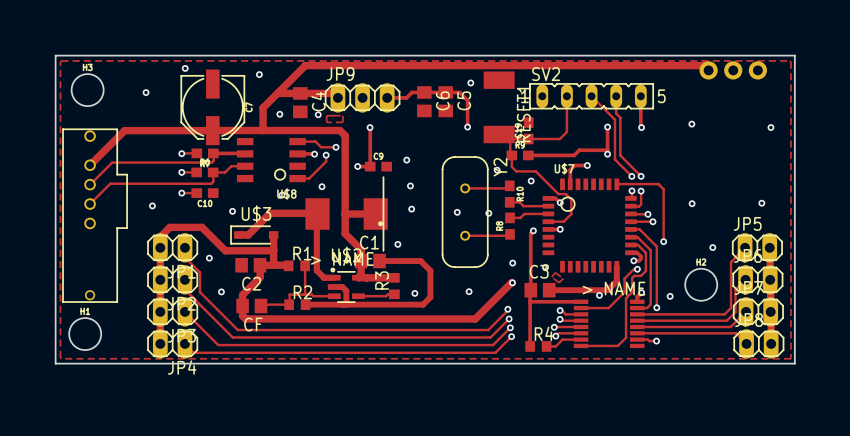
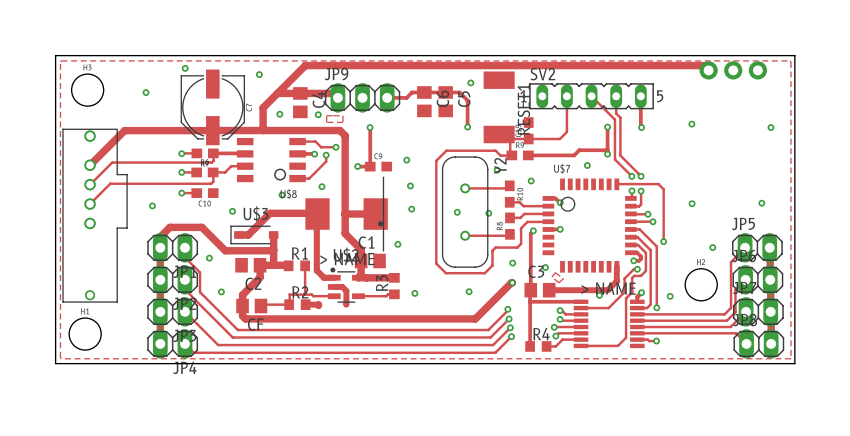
track: (511, 155) (511, 166) (516, 171) (535, 171) (558, 194) (565, 194) (571, 199) (571, 214) (563, 221) (548, 221) -> (511, 155) (500, 155) (495, 150) (446, 150) (436, 160) (436, 263) (445, 273) (484, 273) (492, 265) (492, 250) (495, 247) (517, 247) (521, 243) (521, 228) (527, 221) (548, 221)
track: (587, 165) (574, 165) (570, 169) (570, 184) -> none
track: (379, 261) (420, 261) (430, 270) (430, 297) (423, 304) (318, 304) -> (318, 305) (318, 304)

